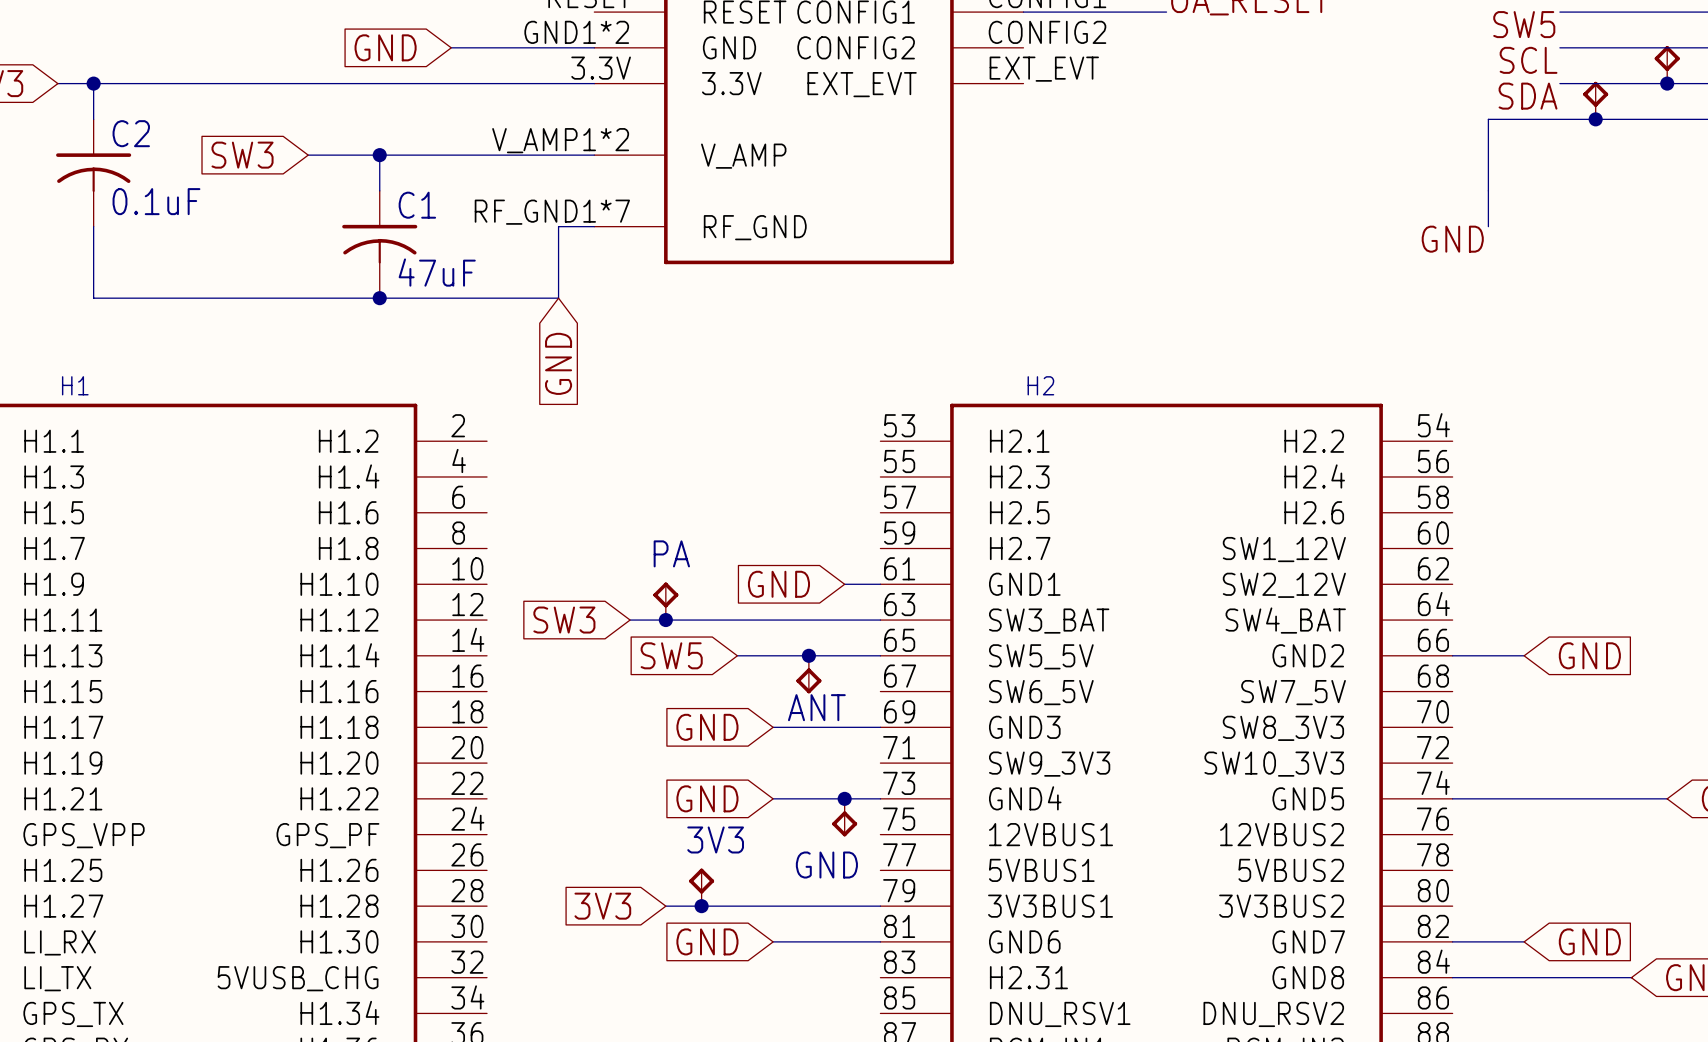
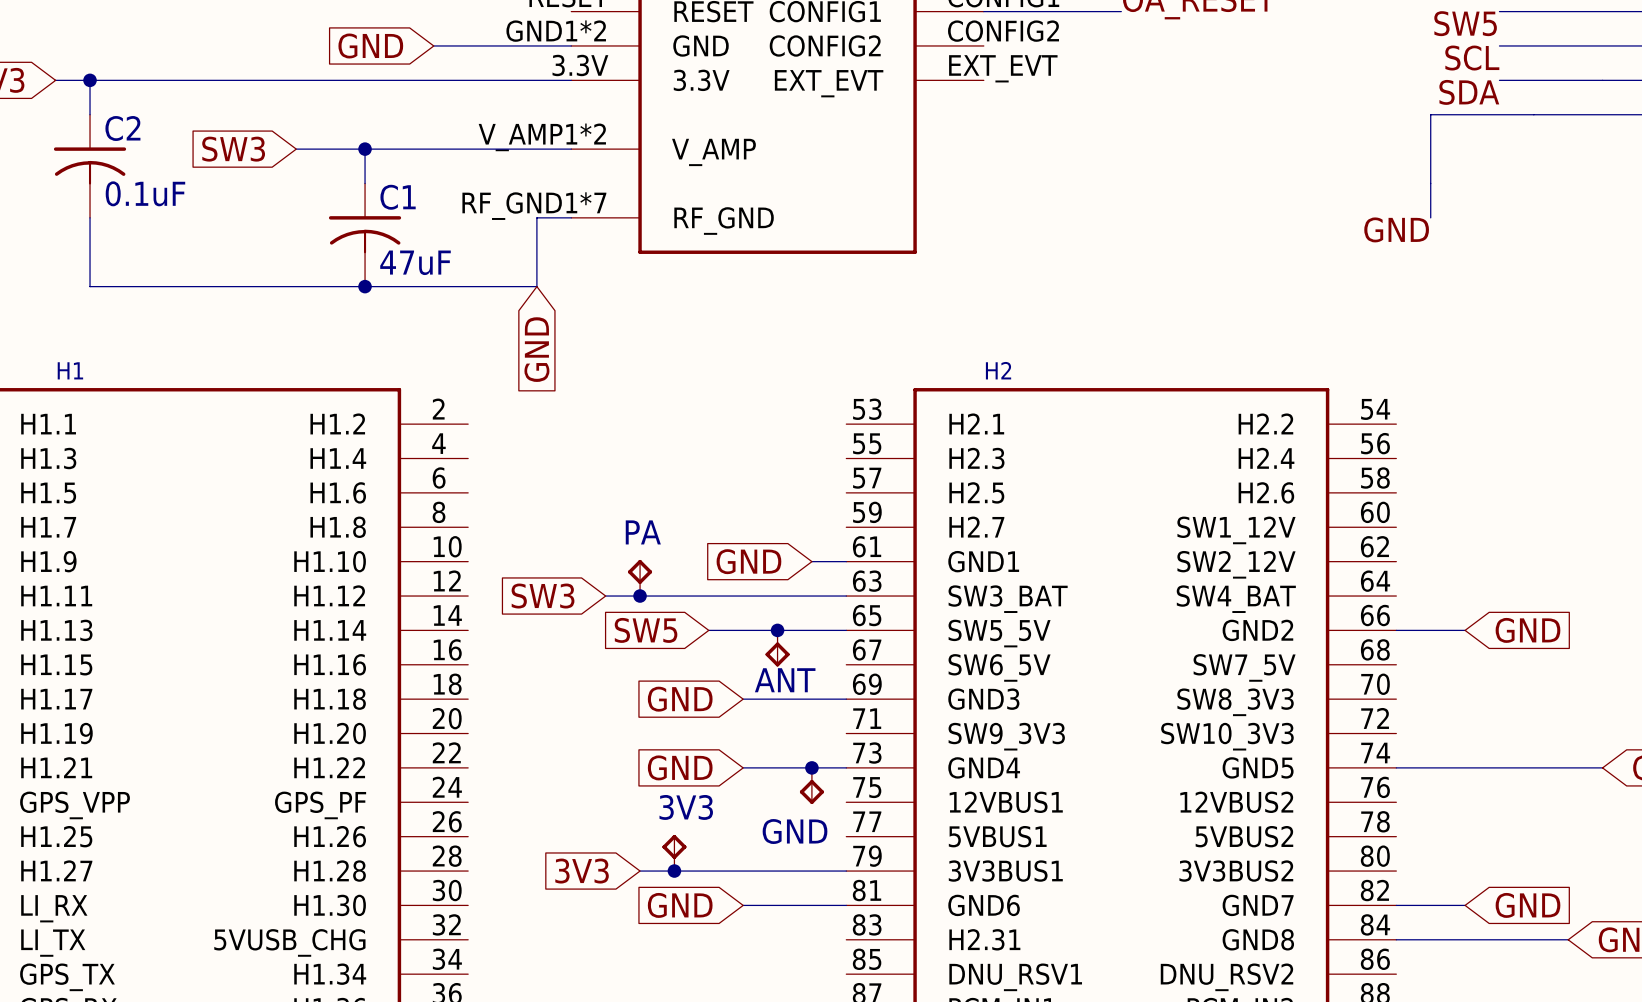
part: (1667, 64) -> none
junction: (1667, 83) -> none
part: (1595, 100) -> none
junction: (1595, 119) -> none

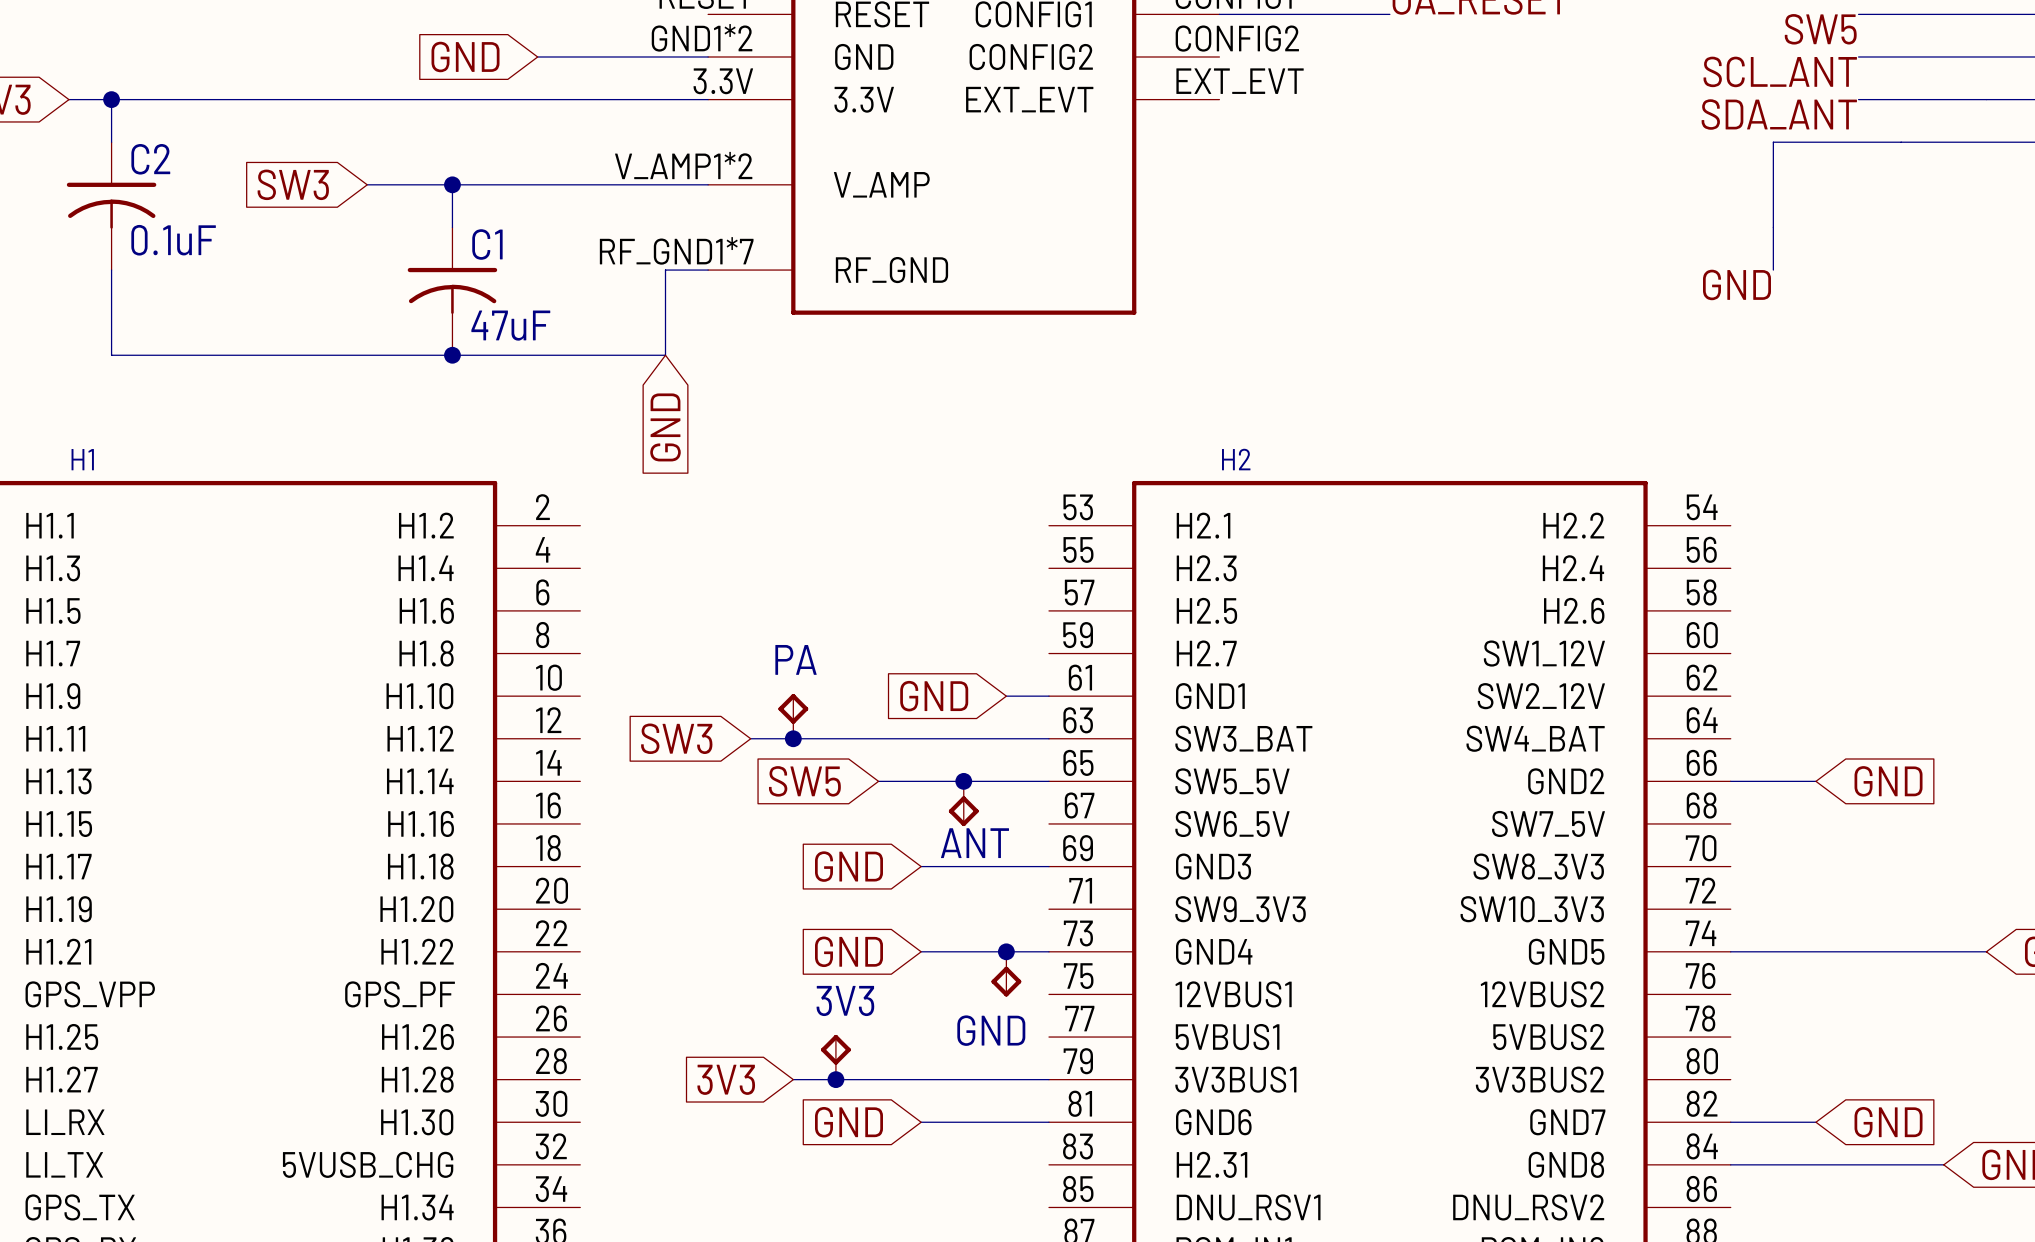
label: SCL (1472, 58) -> SCL_ANT (1780, 71)
label: SDA (1469, 92) -> SDA_ANT (1779, 114)

